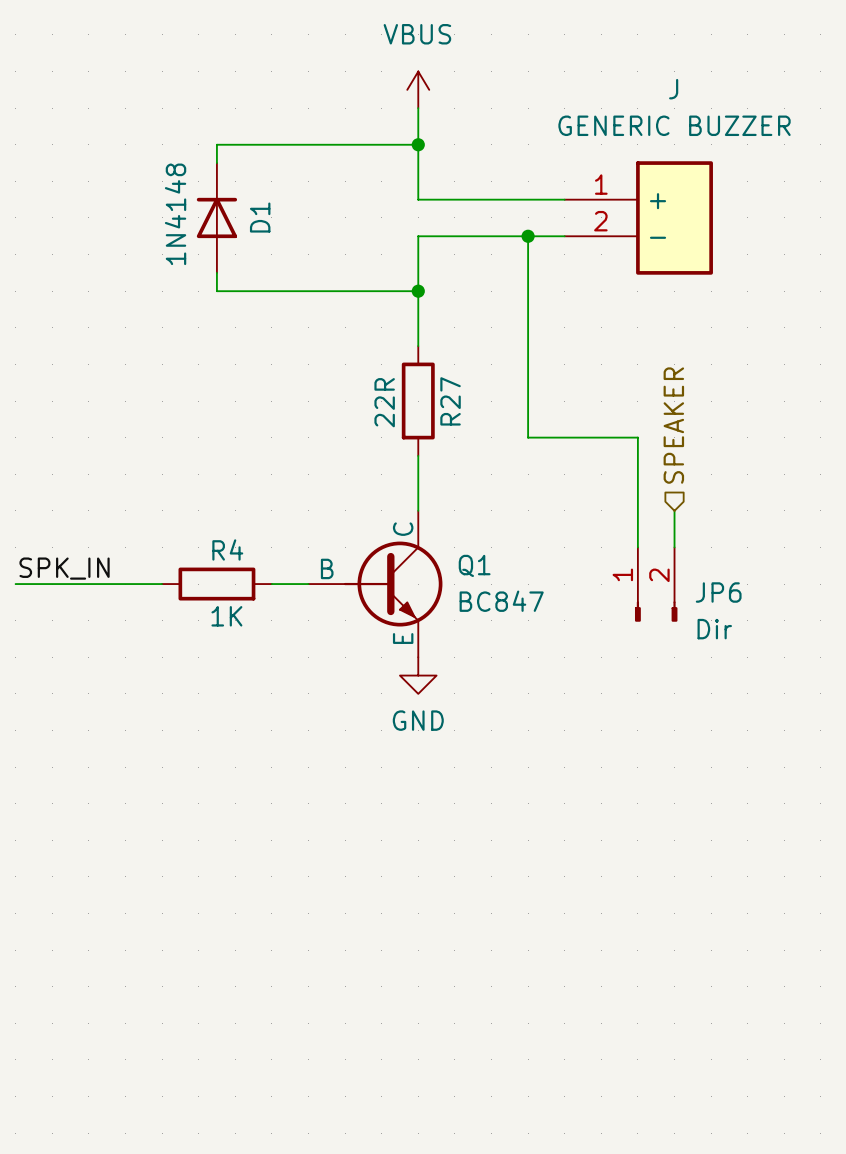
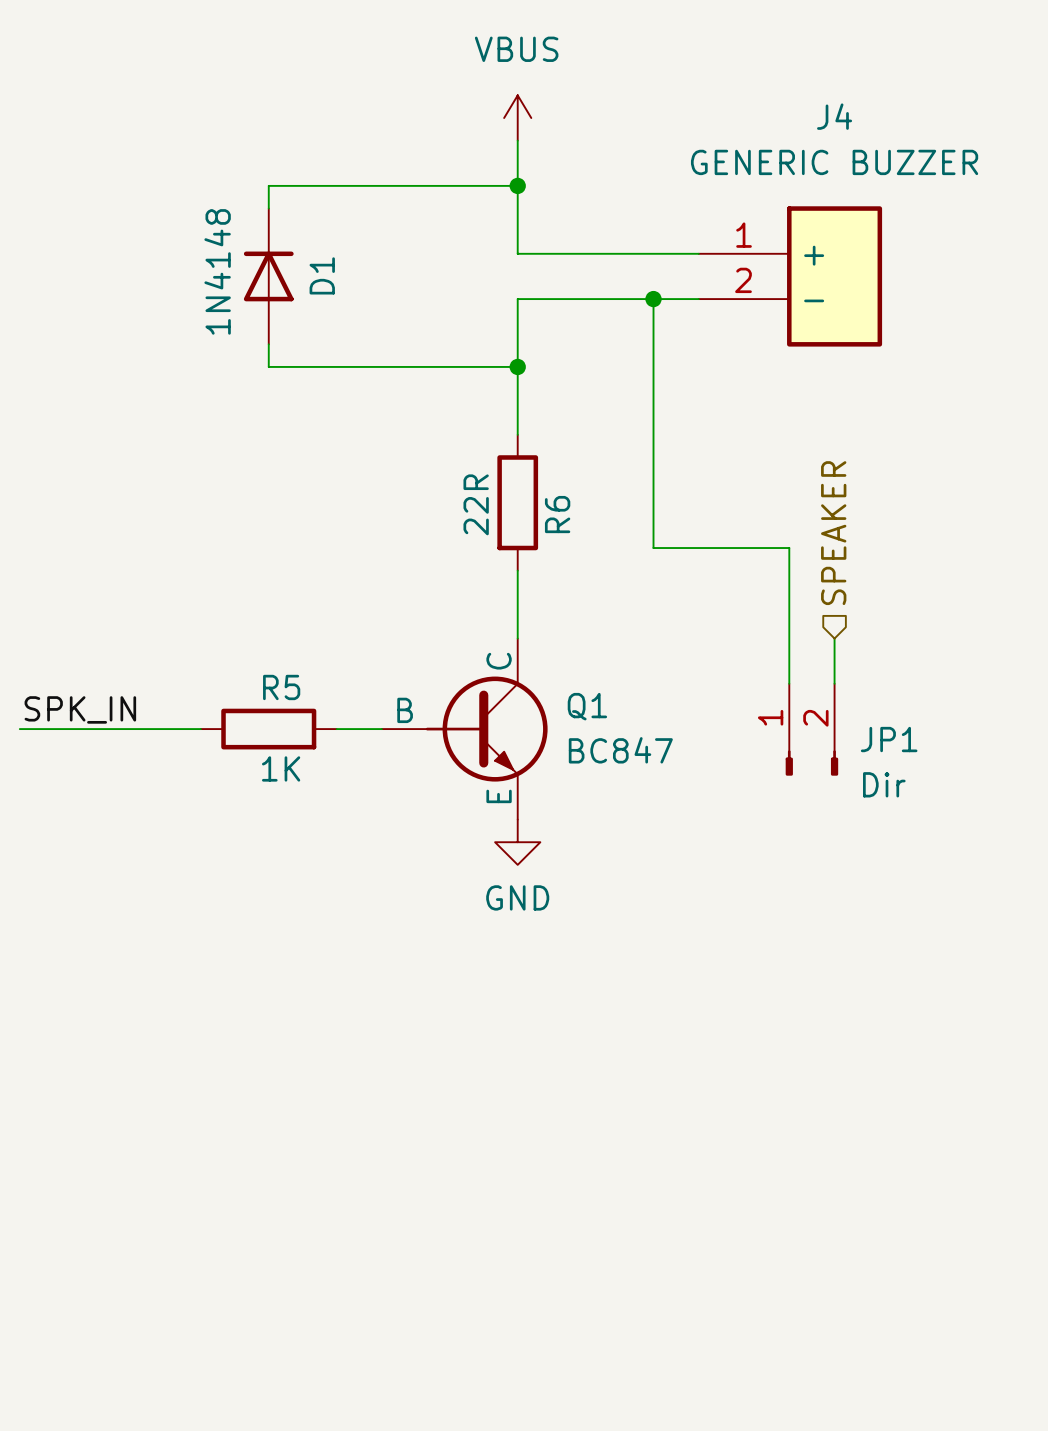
J name: J (673, 89) -> J4 (834, 116)
R27 name: R27 (450, 401) -> R6 (557, 514)
R4 name: R4 (227, 549) -> R5 (281, 687)
JP6 name: JP6 (718, 592) -> JP1 (889, 739)

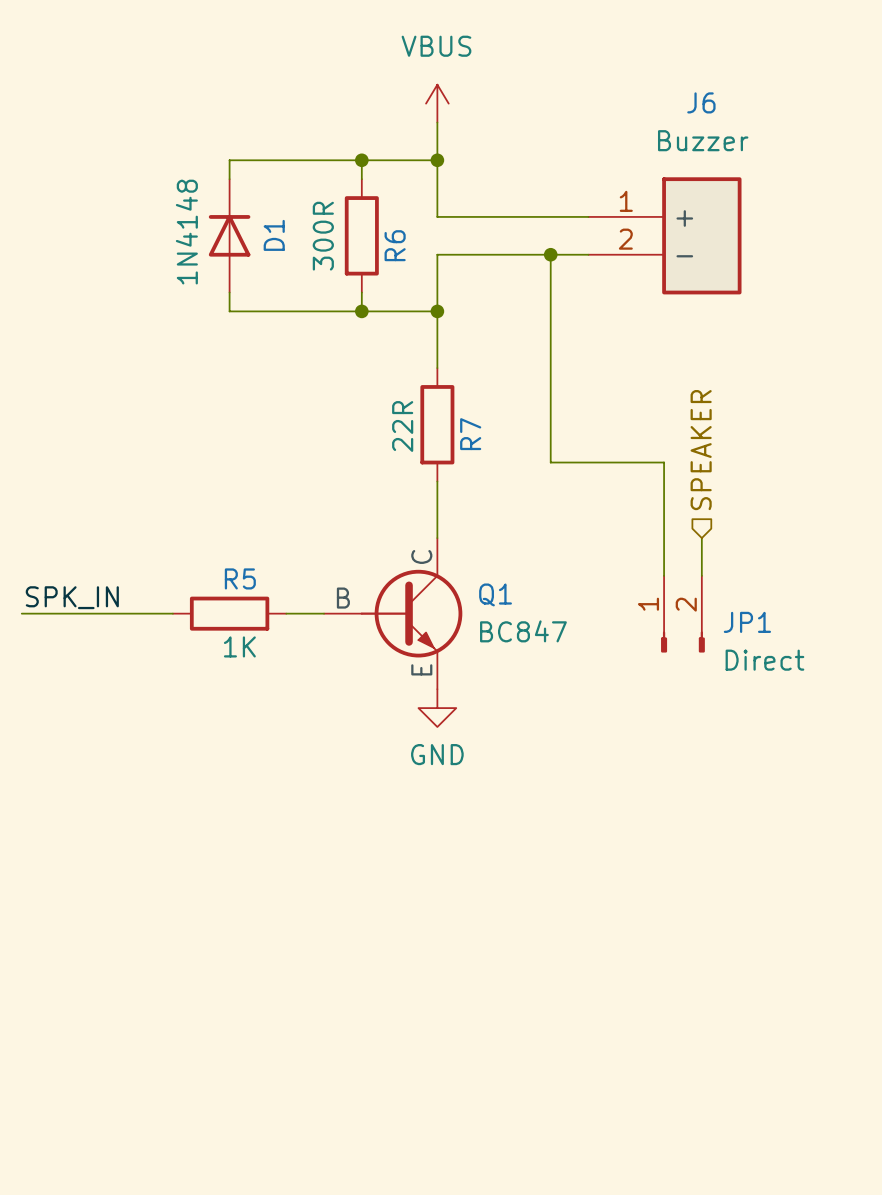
J4 name: J4 (834, 116) -> J6 (701, 102)
J4 value: GENERIC BUZZER (834, 162) -> Buzzer (703, 140)
wire: none -> (361, 160) (361, 179)
junction: none -> (361, 160)
R6: none -> 300R (361, 235)
wire: none -> (361, 292) (361, 311)
junction: none -> (361, 311)
R6 name: R6 (557, 514) -> R7 (470, 434)
JP1 value: Dir (884, 784) -> Direct (764, 660)

